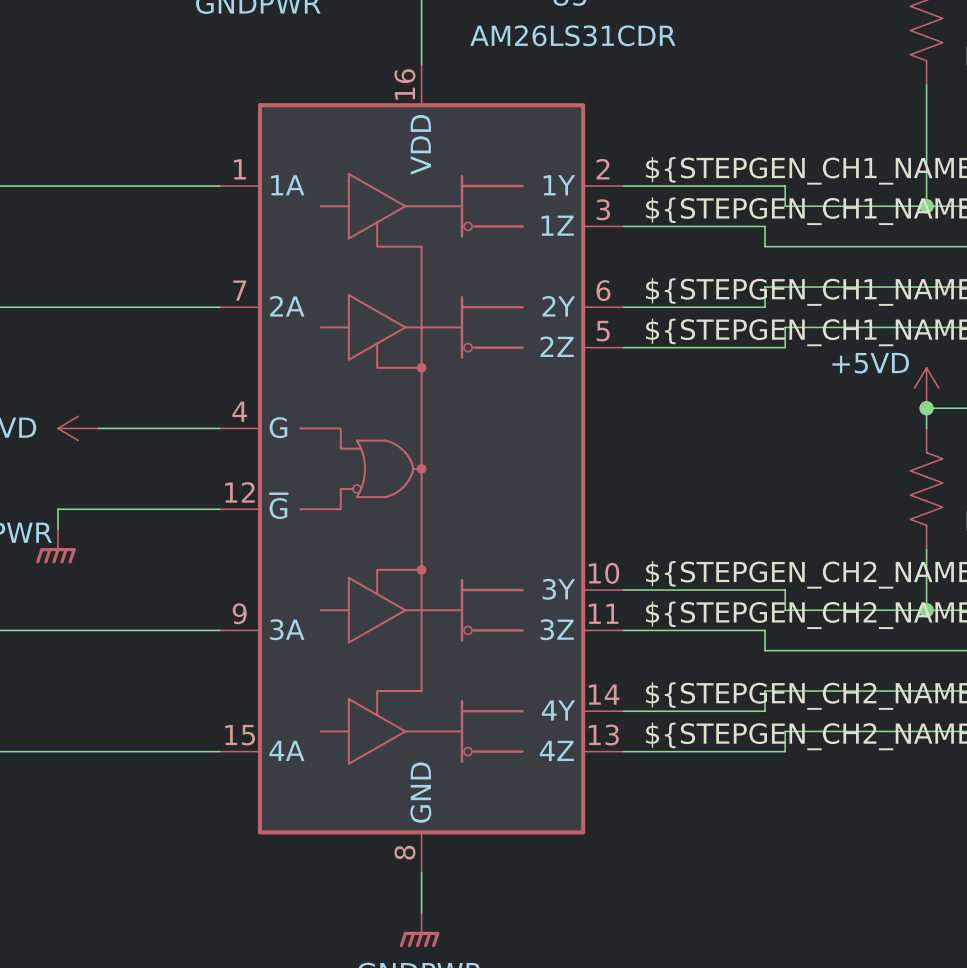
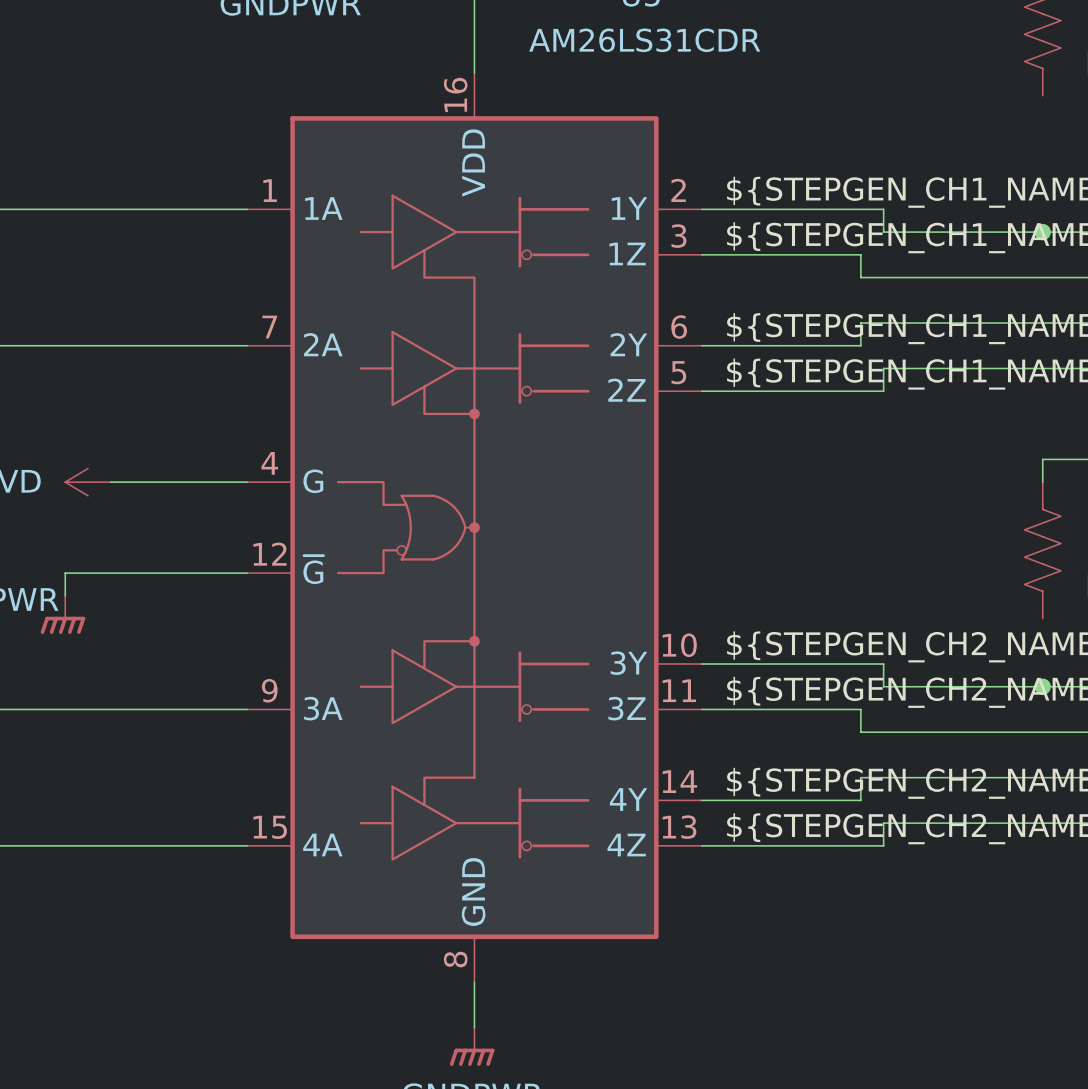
wire: (926, 85) (926, 206) -> none
power symbol: +5VD (926, 388) -> none
junction: (926, 408) -> none
wire: (926, 549) (926, 610) -> none

